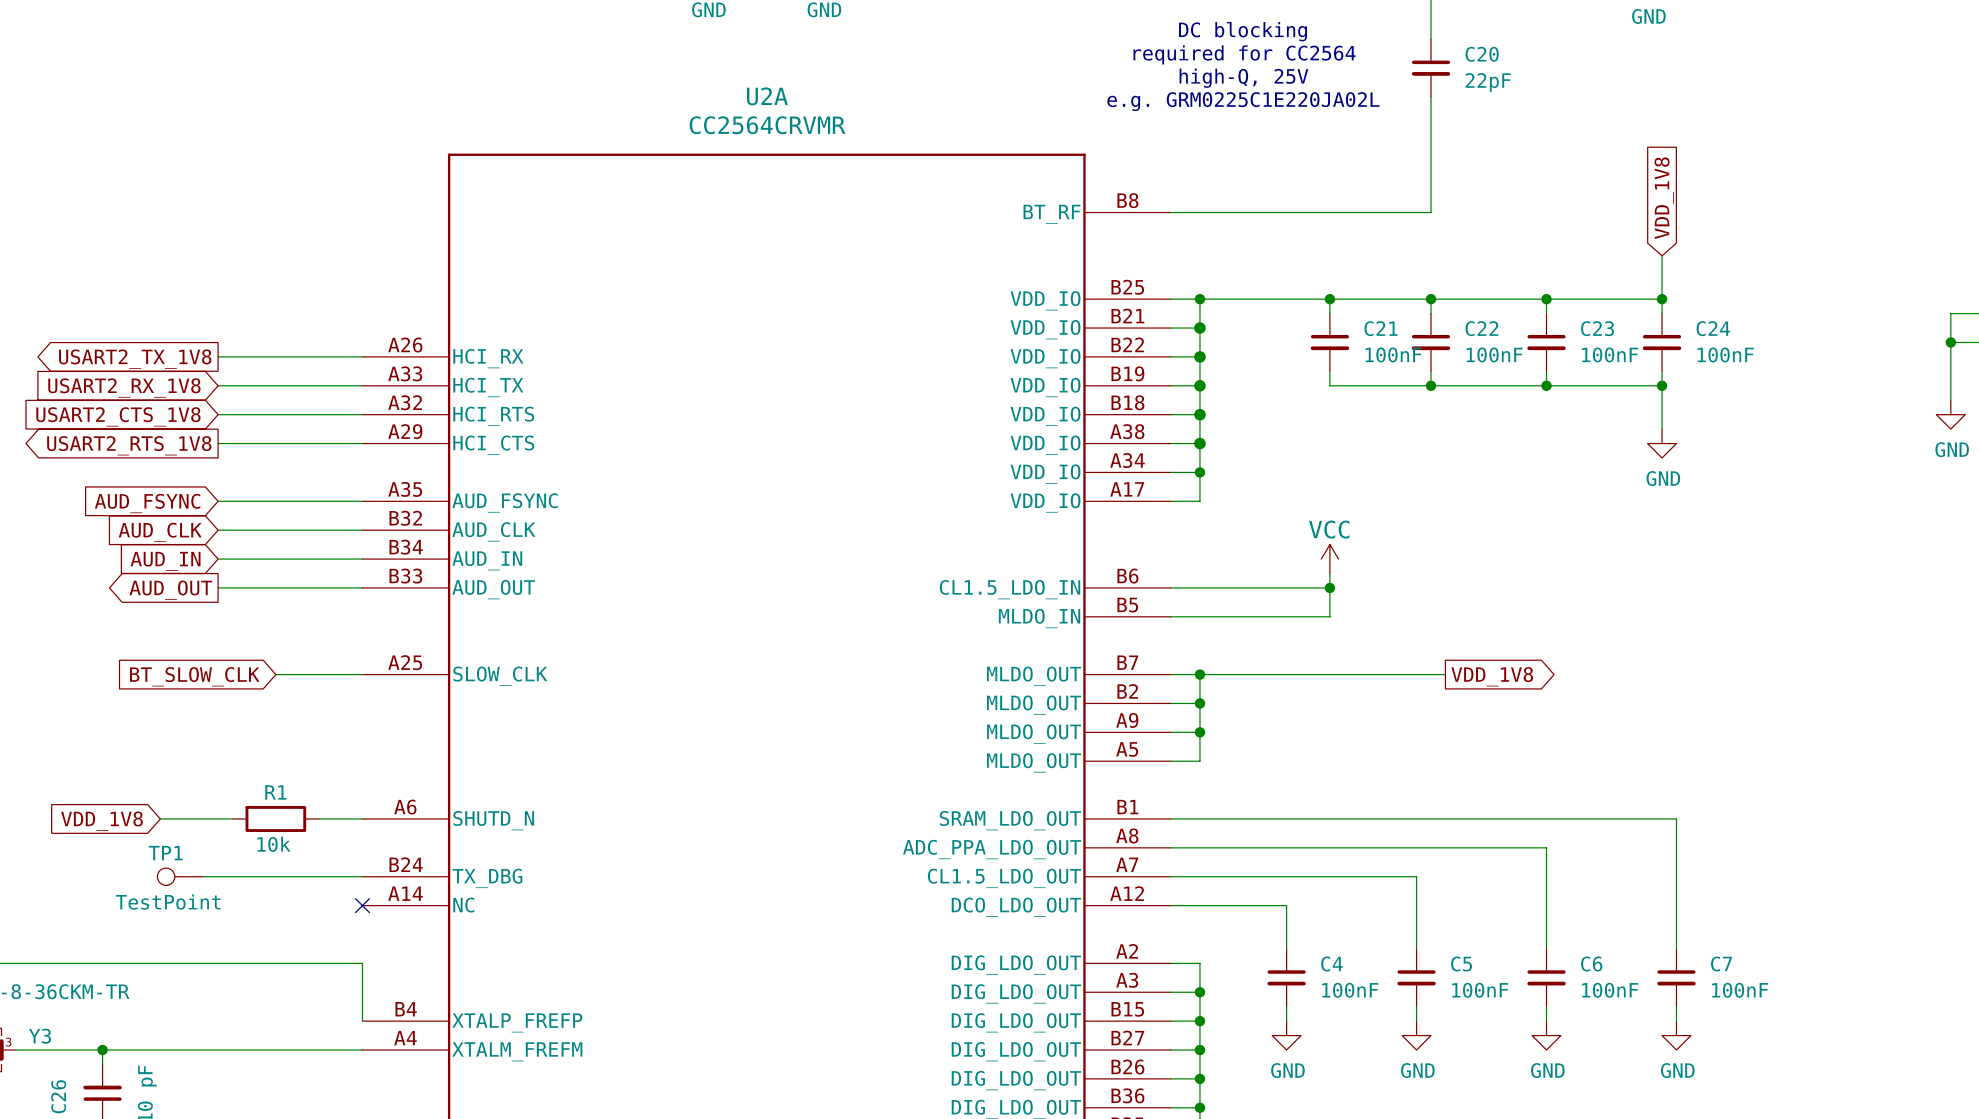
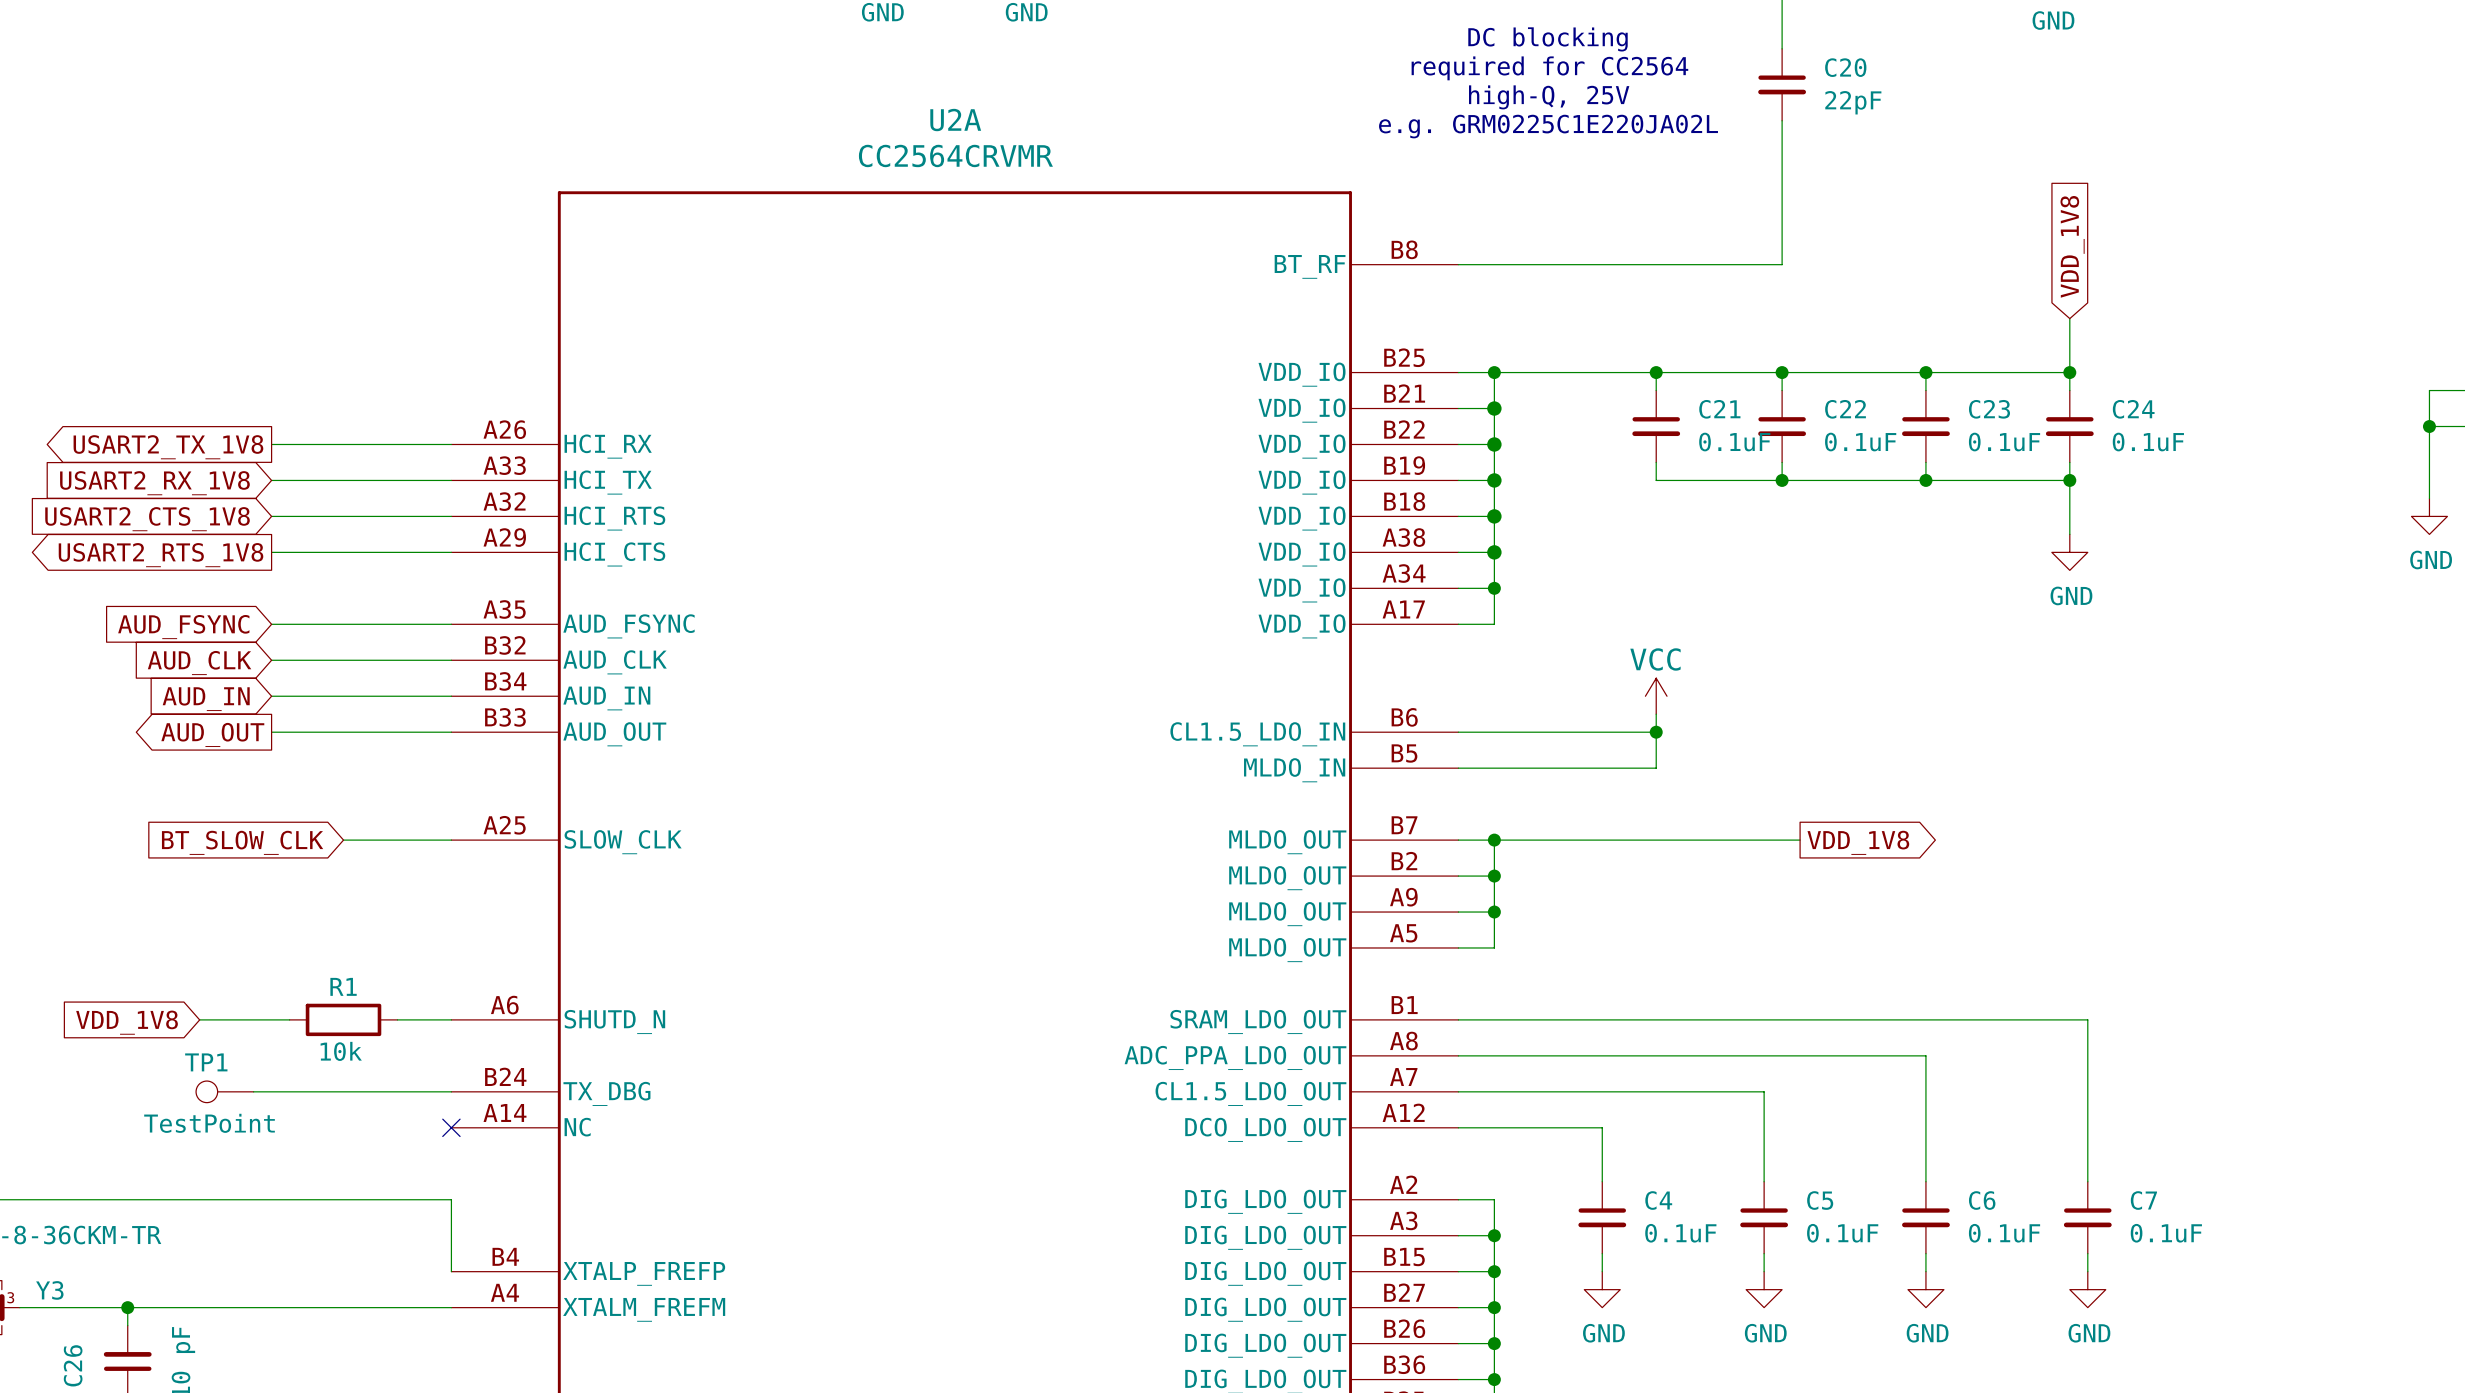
C21 value: 100nF (1393, 354) -> 0.1uF (1734, 442)
C22 value: 100nF (1494, 354) -> 0.1uF (1860, 442)
C23 value: 100nF (1610, 354) -> 0.1uF (2004, 442)
C24 value: 100nF (1725, 354) -> 0.1uF (2148, 442)
C4 value: 100nF (1350, 990) -> 0.1uF (1680, 1233)
C5 value: 100nF (1480, 990) -> 0.1uF (1842, 1233)
C6 value: 100nF (1610, 990) -> 0.1uF (2004, 1233)
C7 value: 100nF (1740, 990) -> 0.1uF (2166, 1233)

